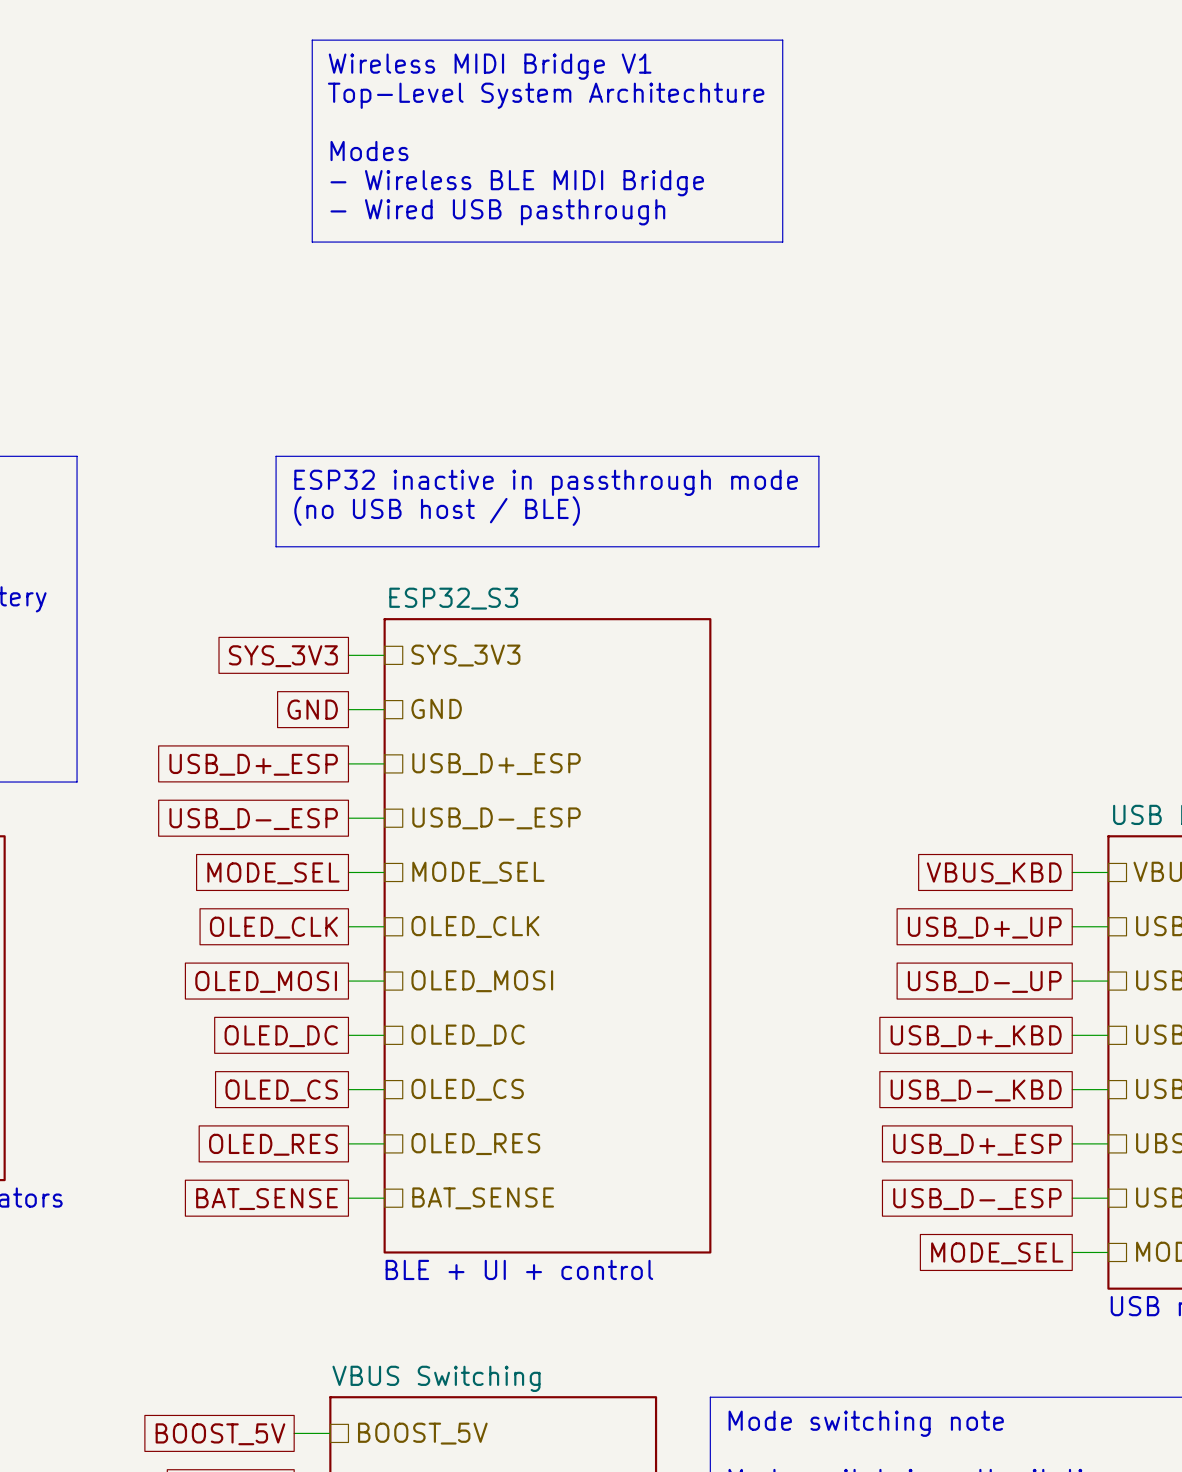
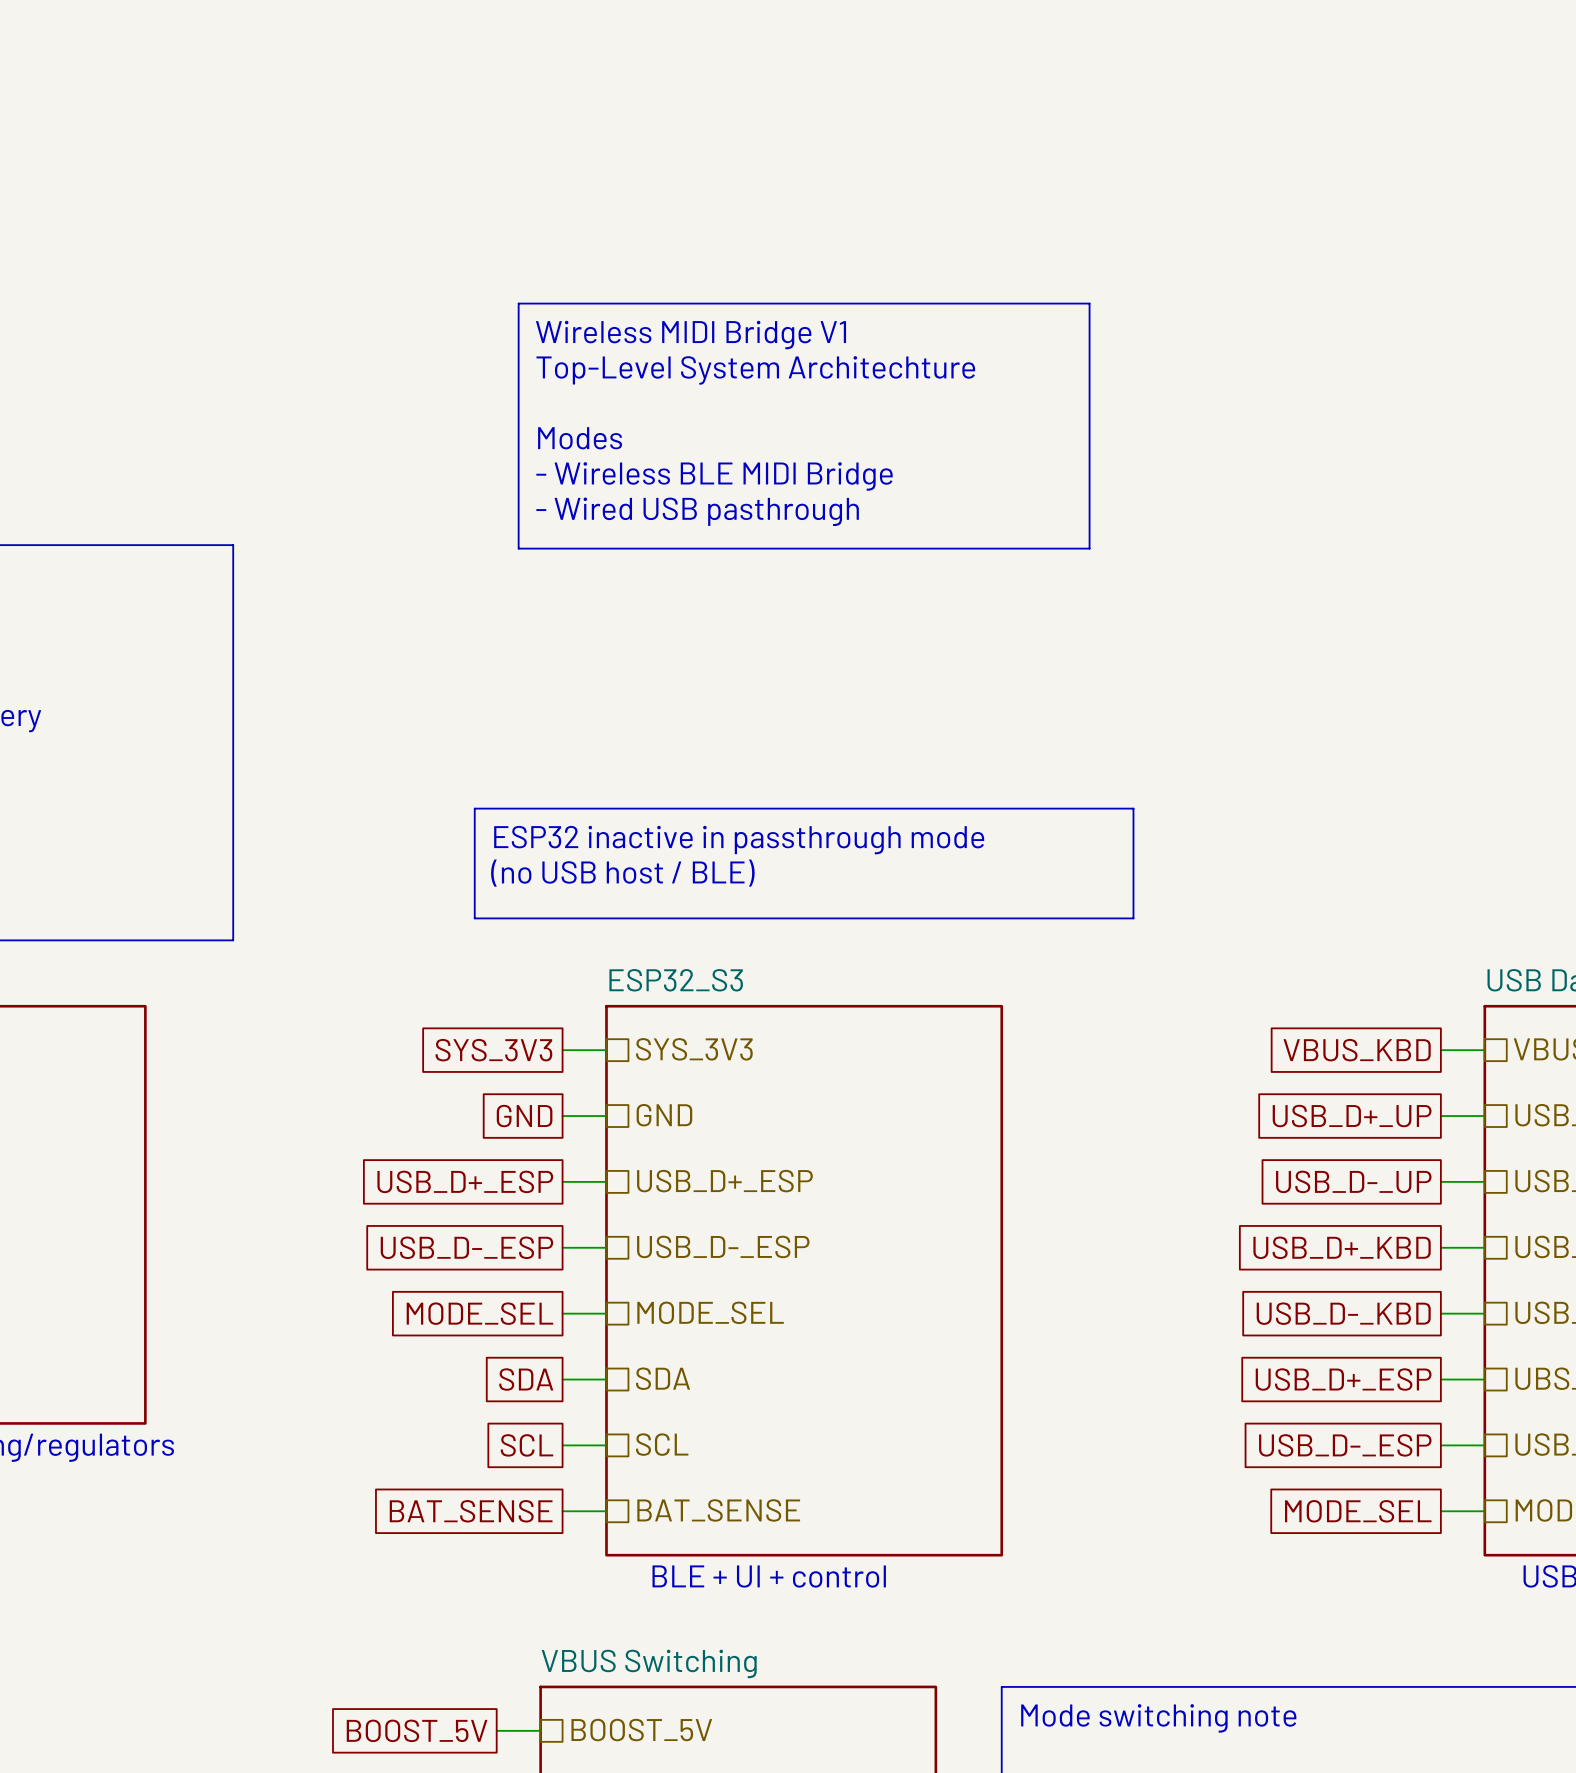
line: (312, 40) (782, 40) (782, 242) (312, 242) (312, 40) -> (518, 303) (1089, 303) (1089, 548) (518, 548) (518, 303)
text position: Wireless MIDI Bridge V1 (490, 66) -> Wireless MIDI Bridge V1 (691, 335)
text position: Top-Level System Architechture (546, 95) -> Top-Level System Architechture (755, 370)
text position: Modes (369, 151) -> Modes (580, 438)
text position: - Wireless BLE MIDI Bridge (517, 183) -> - Wireless BLE MIDI Bridge (714, 476)
text position: - Wired USB pasthrough (497, 212) -> - Wired USB pasthrough (697, 511)
line: (276, 456) (818, 456) (818, 546) (276, 546) (276, 456) -> (474, 808) (1133, 808) (1133, 918) (474, 918) (474, 808)
text position: ESP32 inactive in passthrough mode (546, 482) -> ESP32 inactive in passthrough mode (739, 840)
text position: (no USB host / BLE) (437, 511) -> (no USB host / BLE) (622, 873)
sheet ESP32_S3 name position: ESP32_S3 (453, 598) -> ESP32_S3 (676, 980)
sheet ESP32_S3 shape: [383, 618, 712, 1254] -> [605, 1004, 1004, 1557]
wire: (348, 655) (384, 655) -> none
hierarchical label: SYS_3V3 (465, 655) -> none
global label: SYS_3V3 (283, 656) -> none
hierarchical label: GND (436, 708) -> none
global label: GND (312, 709) -> none
wire: (348, 709) (384, 709) -> none
global label: USB_D+_ESP (253, 764) -> none
hierarchical label: USB_D+_ESP (496, 764) -> none
wire: (348, 818) (384, 818) -> none
hierarchical label: USB_D-_ESP (496, 818) -> none
global label: USB_D-_ESP (253, 819) -> none
hierarchical label: MODE_SEL (478, 872) -> SYS_3V3 (694, 1049)
global label: MODE_SEL (273, 873) -> SYS_3V3 (493, 1050)
hierarchical label: OLED_CLK (475, 926) -> GND (664, 1115)
global label: OLED_CLK (273, 927) -> GND (524, 1116)
global label: OLED_MOSI (266, 981) -> USB_D+_ESP (465, 1181)
hierarchical label: OLED_MOSI (482, 981) -> USB_D+_ESP (724, 1181)
hierarchical label: OLED_DC (468, 1035) -> USB_D-_ESP (723, 1246)
global label: OLED_DC (281, 1036) -> USB_D-_ESP (466, 1247)
hierarchical label: OLED_CS (467, 1089) -> MODE_SEL (710, 1312)
global label: OLED_CS (281, 1090) -> MODE_SEL (479, 1313)
global label: OLED_RES (273, 1144) -> SDA (526, 1379)
hierarchical label: OLED_RES (475, 1144) -> SDA (663, 1378)
hierarchical label: BAT_SENSE (483, 1198) -> SCL (662, 1444)
global label: BAT_SENSE (266, 1199) -> SCL (527, 1445)
wire: none -> (562, 1511) (606, 1511)
hierarchical label: none -> BAT_SENSE (718, 1510)
global label: none -> BAT_SENSE (471, 1511)
text position: BLE + UI + control (519, 1269) -> BLE + UI + control (769, 1576)

